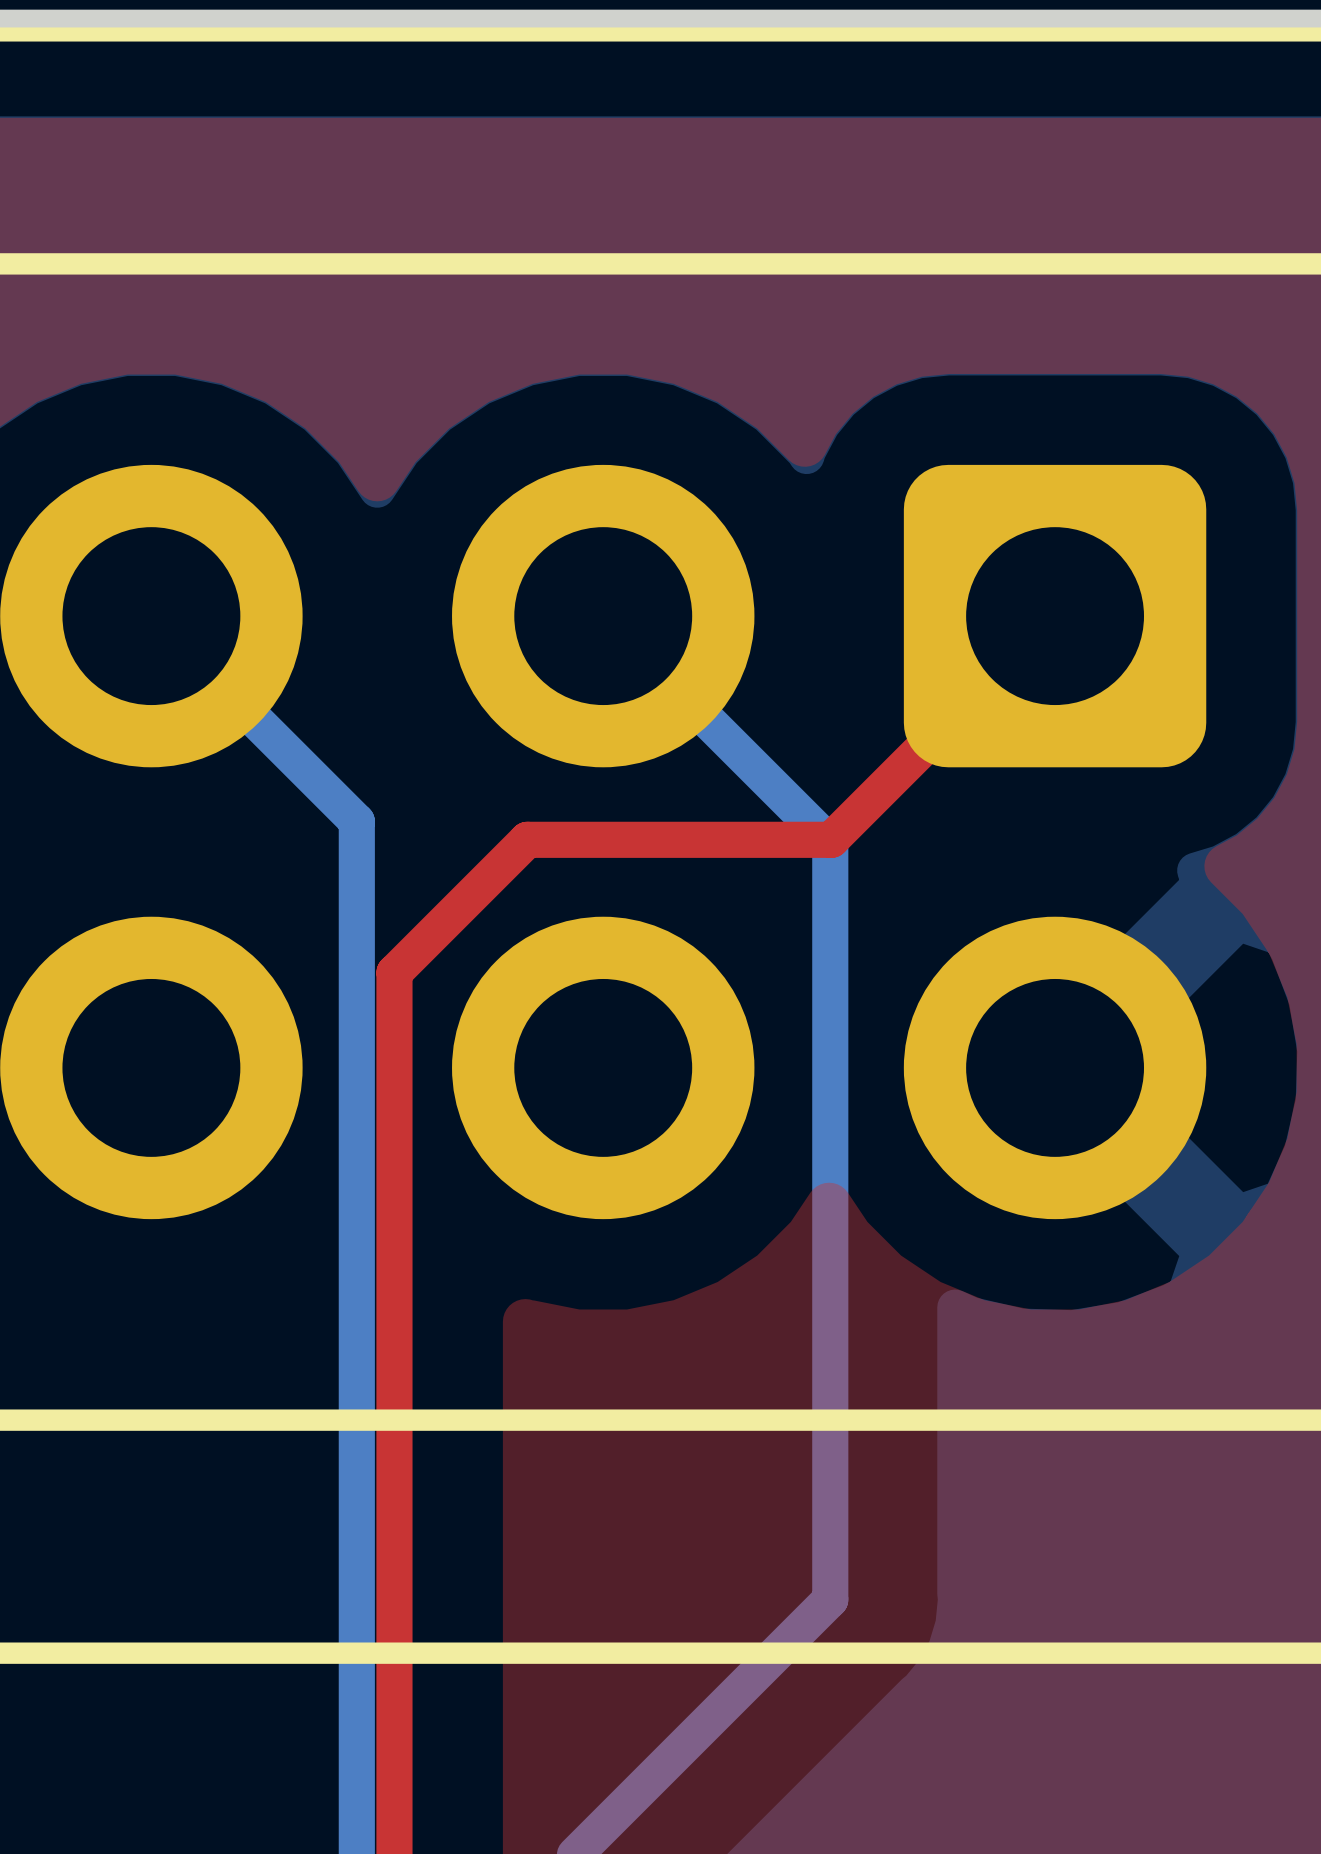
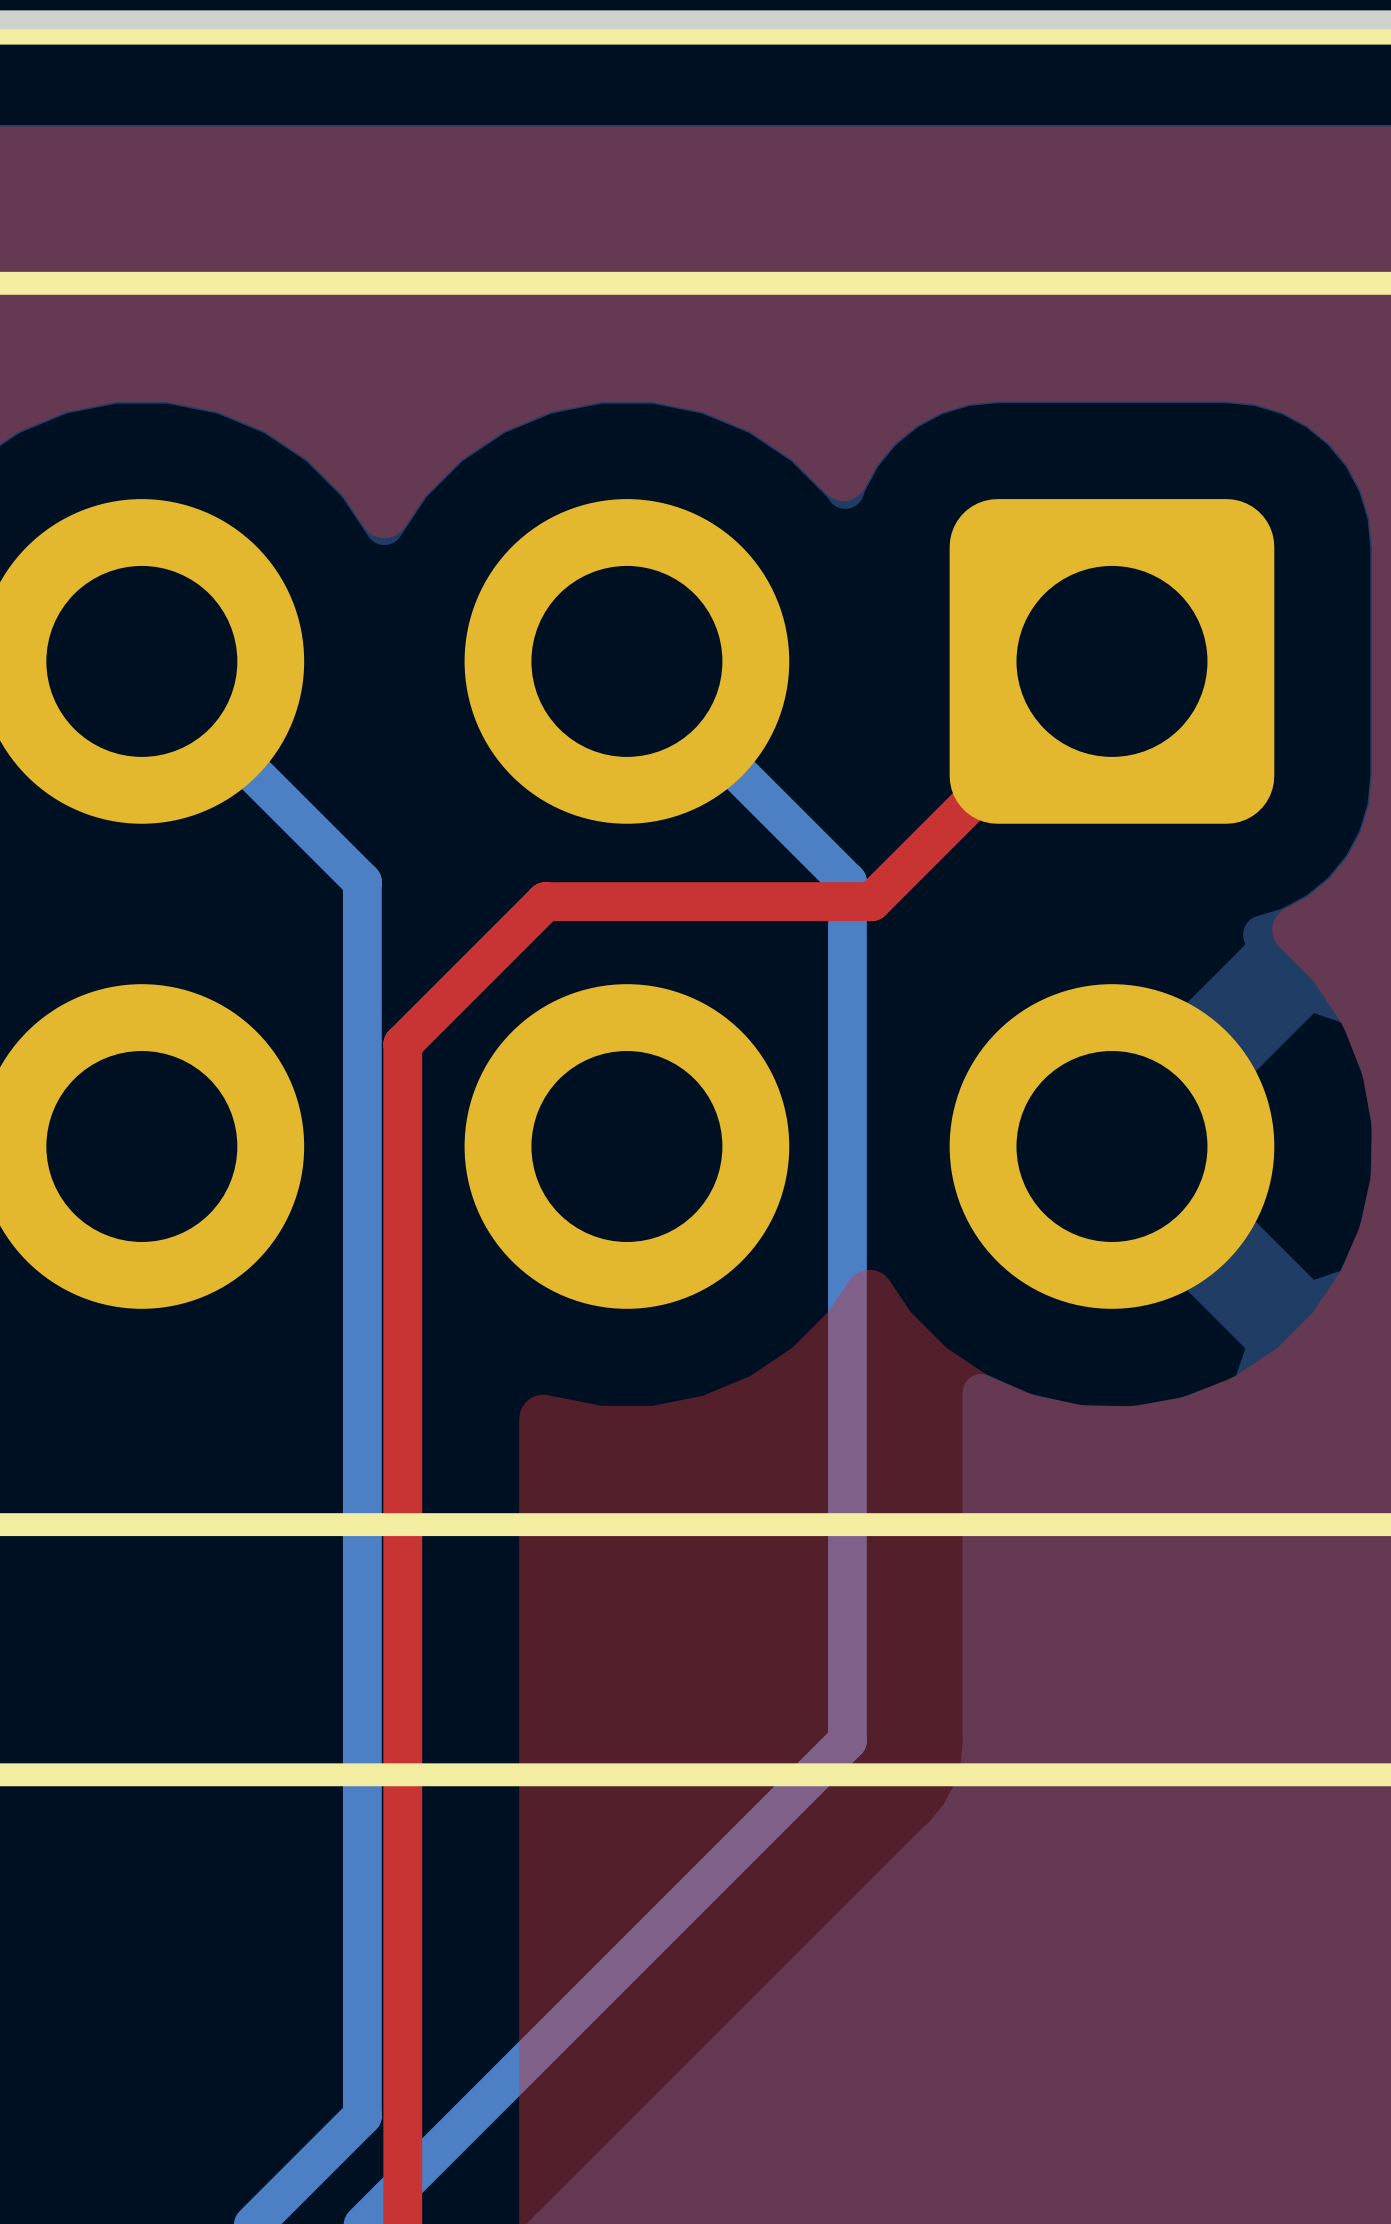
bottom track: (808, 821) (830, 843) (830, 1599) (808, 1621) -> (847, 881) (847, 1740)

